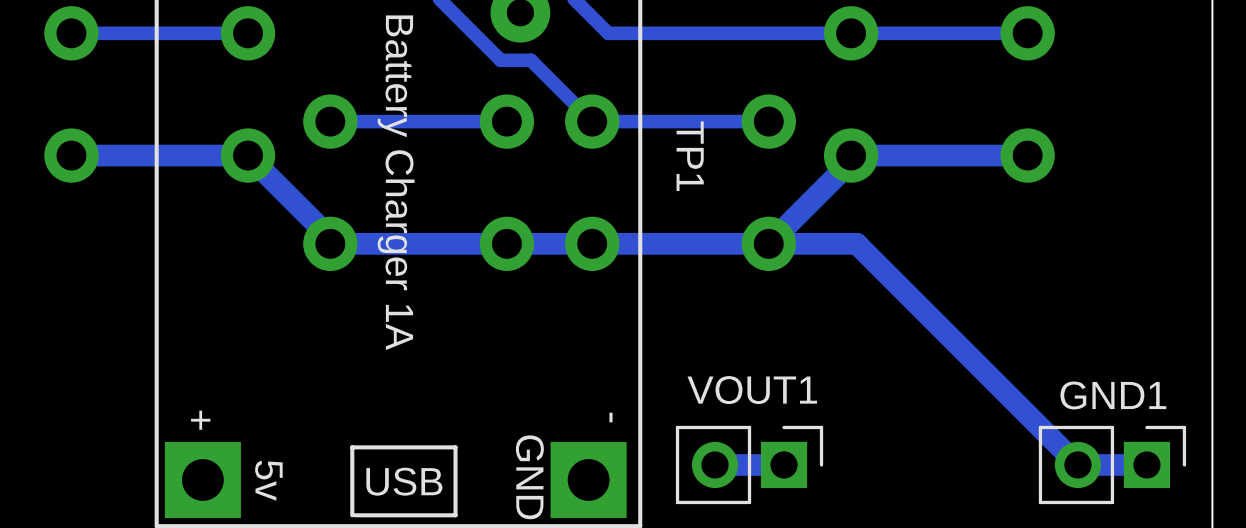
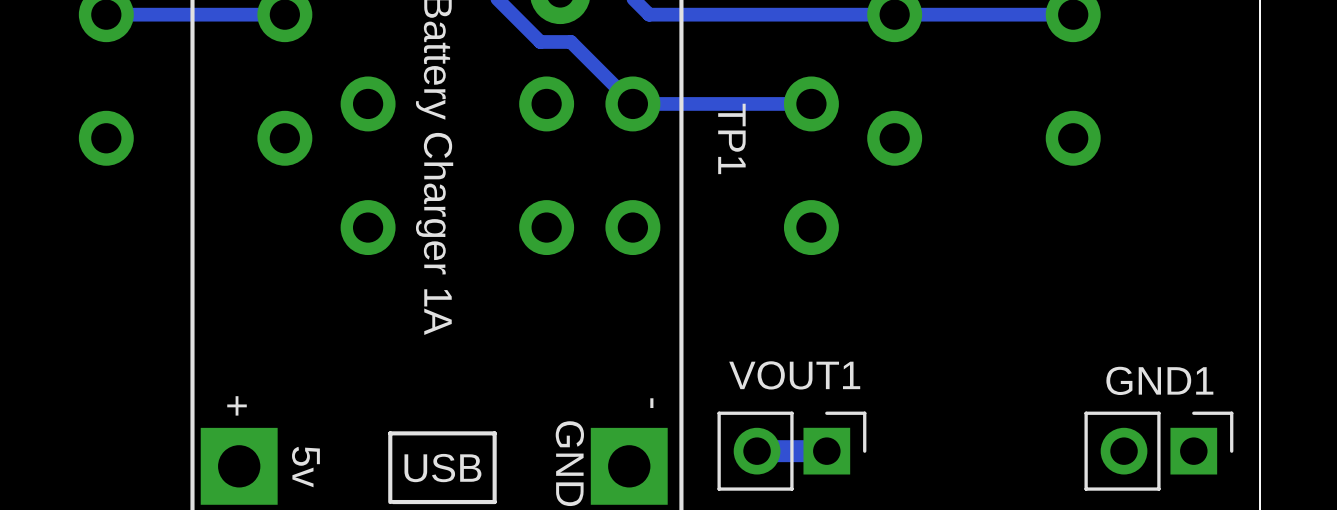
track: (506, 121) (330, 121) -> none
track: (71, 155) (248, 155) (330, 237) (330, 243) (856, 243) (1077, 464) (1146, 464) -> none
track: (1027, 155) (851, 155) (851, 161) (768, 243) -> none

